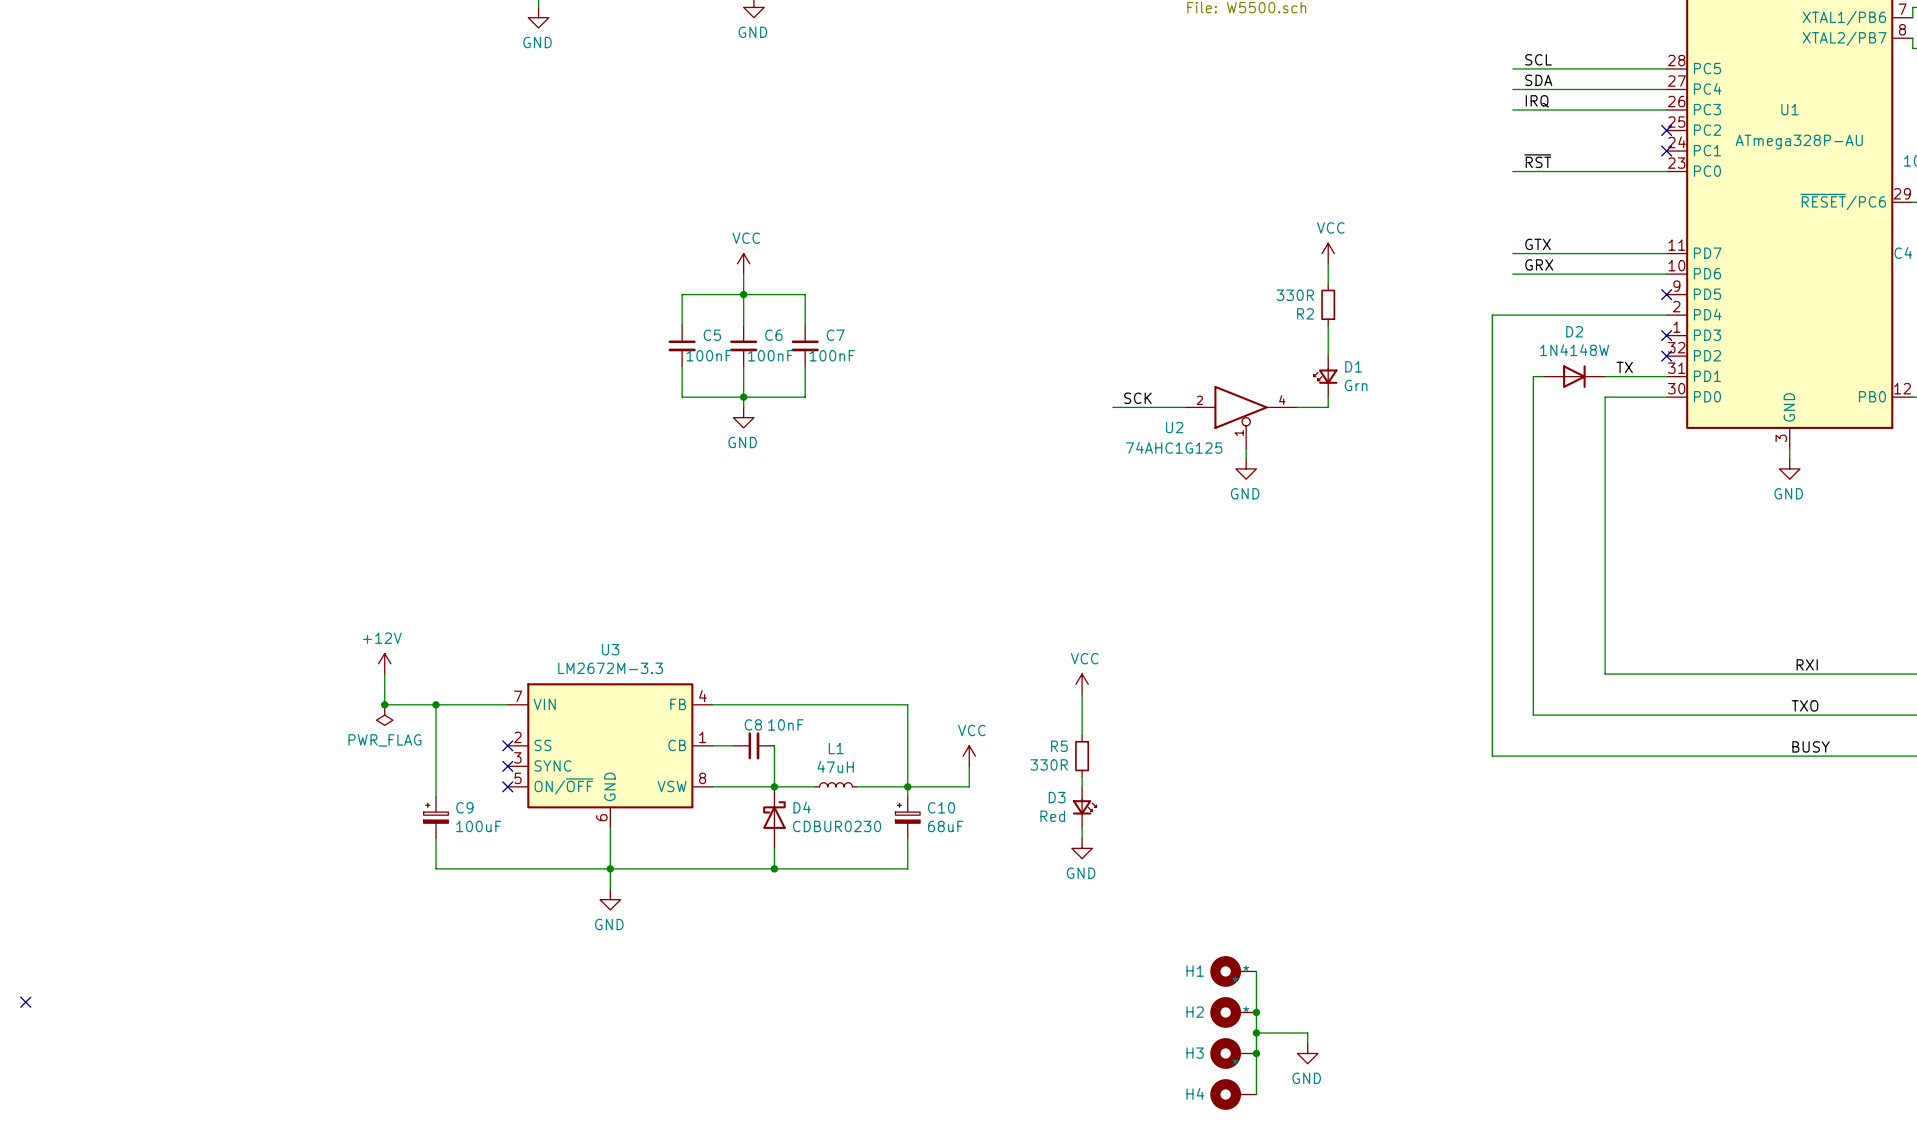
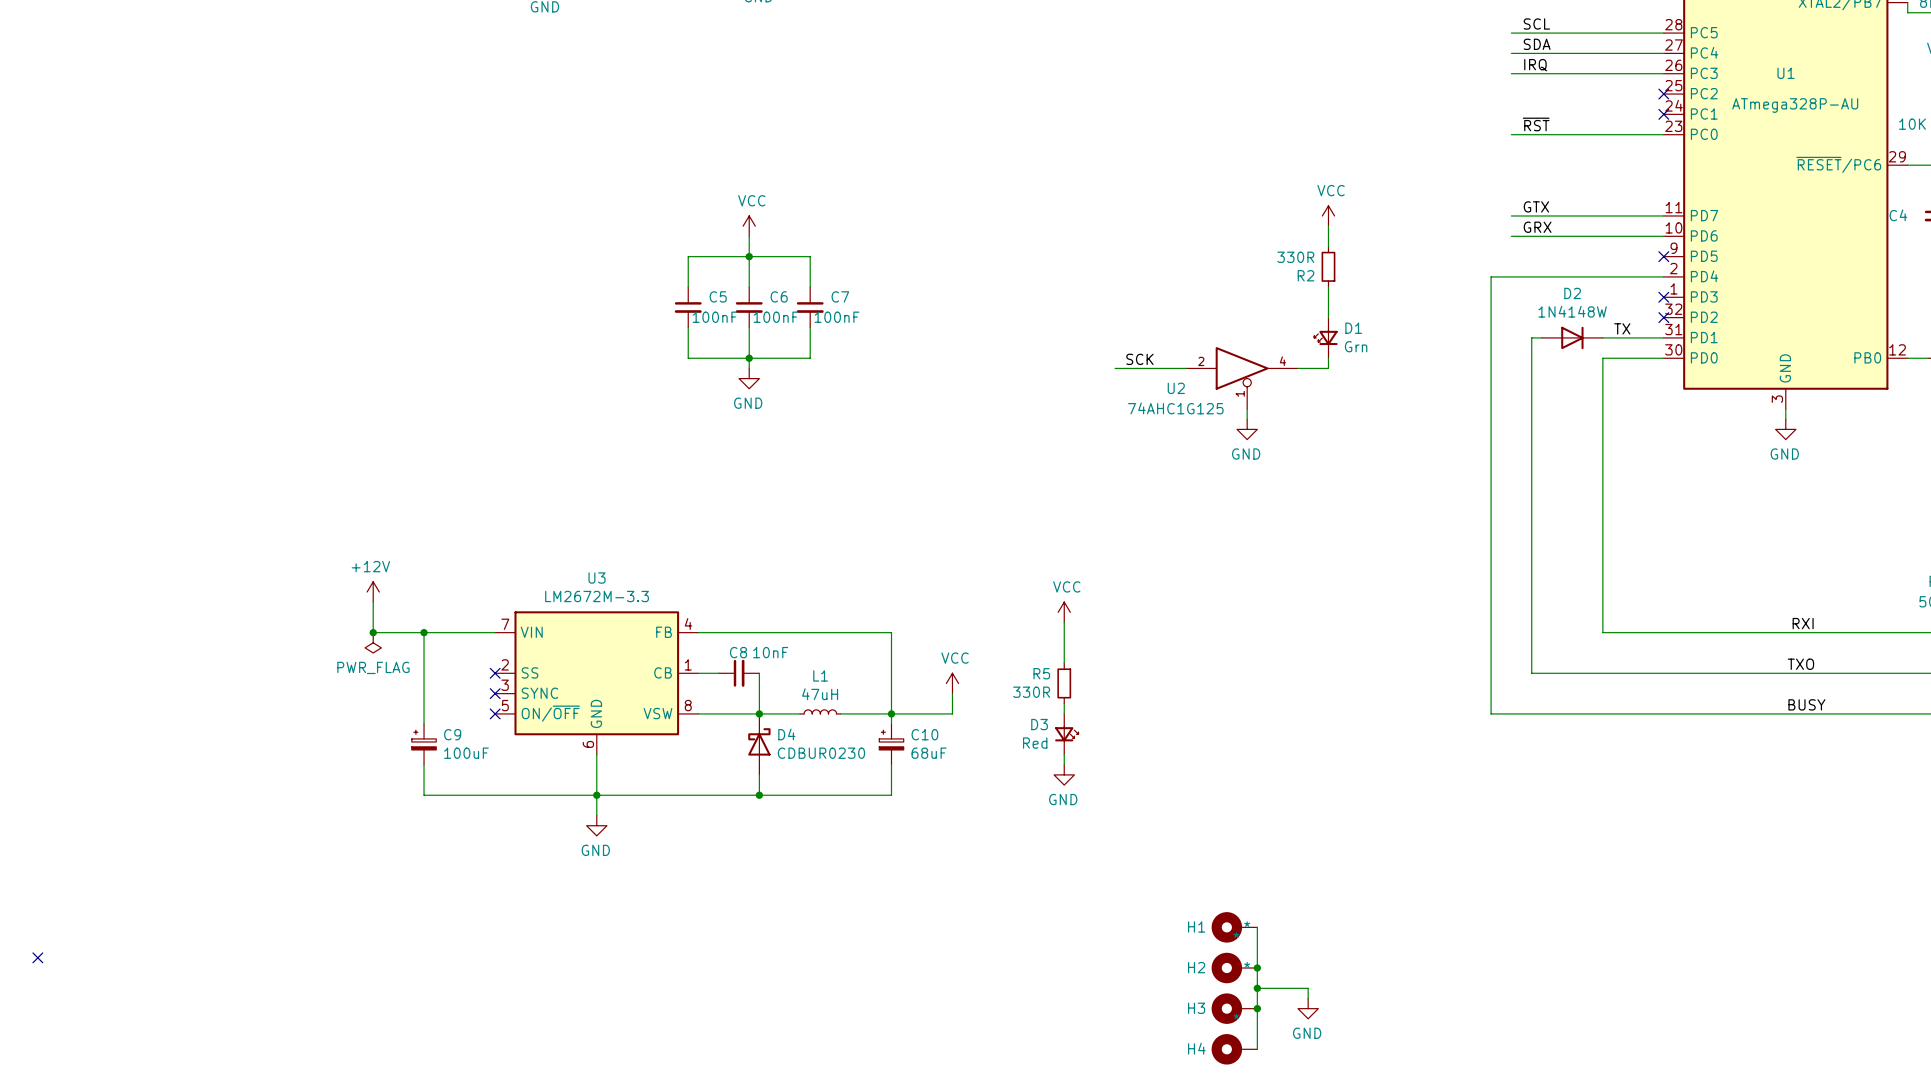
power symbol position: +12V (384, 663) -> +12V (373, 592)
junction: none -> (373, 632)
wire: (384, 674) (384, 704) (507, 704) -> (373, 602) (373, 632) (495, 632)
junction: none -> (424, 632)
power symbol position: VCC (1082, 684) -> VCC (1064, 612)
wire: (1082, 694) (1082, 735) -> (1064, 622) (1064, 663)
junction: (384, 704) -> none
wire: (435, 704) (435, 797) -> (424, 632) (424, 724)
junction: (435, 704) -> none
wire: (712, 704) (907, 704) (907, 797) -> (698, 632) (891, 632) (891, 724)
power symbol position: PWR_FLAG (384, 715) -> PWR_FLAG (373, 642)
no-connect mark: none -> (495, 673)
no-connect mark: none -> (495, 693)
no-connect mark: (507, 745) -> none
wire: (712, 745) (733, 745) -> (698, 673) (718, 673)
C8 position: (753, 745) -> (739, 673)
wire: (774, 745) (774, 786) -> (759, 673) (759, 713)
U3 position: (610, 755) -> (596, 682)
no-connect mark: none -> (495, 713)
junction: none -> (759, 713)
power symbol position: VCC (969, 756) -> VCC (952, 683)
R5 position: (1082, 756) -> (1064, 683)
no-connect mark: (507, 766) -> none
wire: (969, 766) (969, 786) (856, 786) -> (952, 693) (952, 713) (840, 713)
wire: (1082, 776) (1082, 786) -> (1064, 703) (1064, 713)
L1 position: (835, 784) -> (820, 711)
no-connect mark: (507, 786) -> none
wire: (712, 786) (815, 786) -> (698, 713) (800, 713)
junction: (774, 786) -> none
junction position: (907, 786) -> (891, 713)
D3 position: (1084, 807) -> (1066, 734)
C9 position: (435, 817) -> (424, 744)
D4 position: (774, 817) -> (759, 744)
C10 position: (907, 817) -> (891, 744)
wire: (610, 827) (610, 889) -> (596, 754) (596, 815)
wire: (1082, 827) (1082, 838) -> (1064, 754) (1064, 764)
wire: (435, 838) (435, 868) (907, 868) (907, 838) -> (424, 764) (424, 795) (891, 795) (891, 764)
junction: none -> (759, 795)
wire: (774, 848) (774, 868) -> (759, 774) (759, 795)
power symbol position: GND (1082, 848) -> GND (1064, 774)
junction position: (610, 868) -> (596, 795)
junction: (774, 868) -> none
power symbol position: GND (610, 899) -> GND (596, 825)

